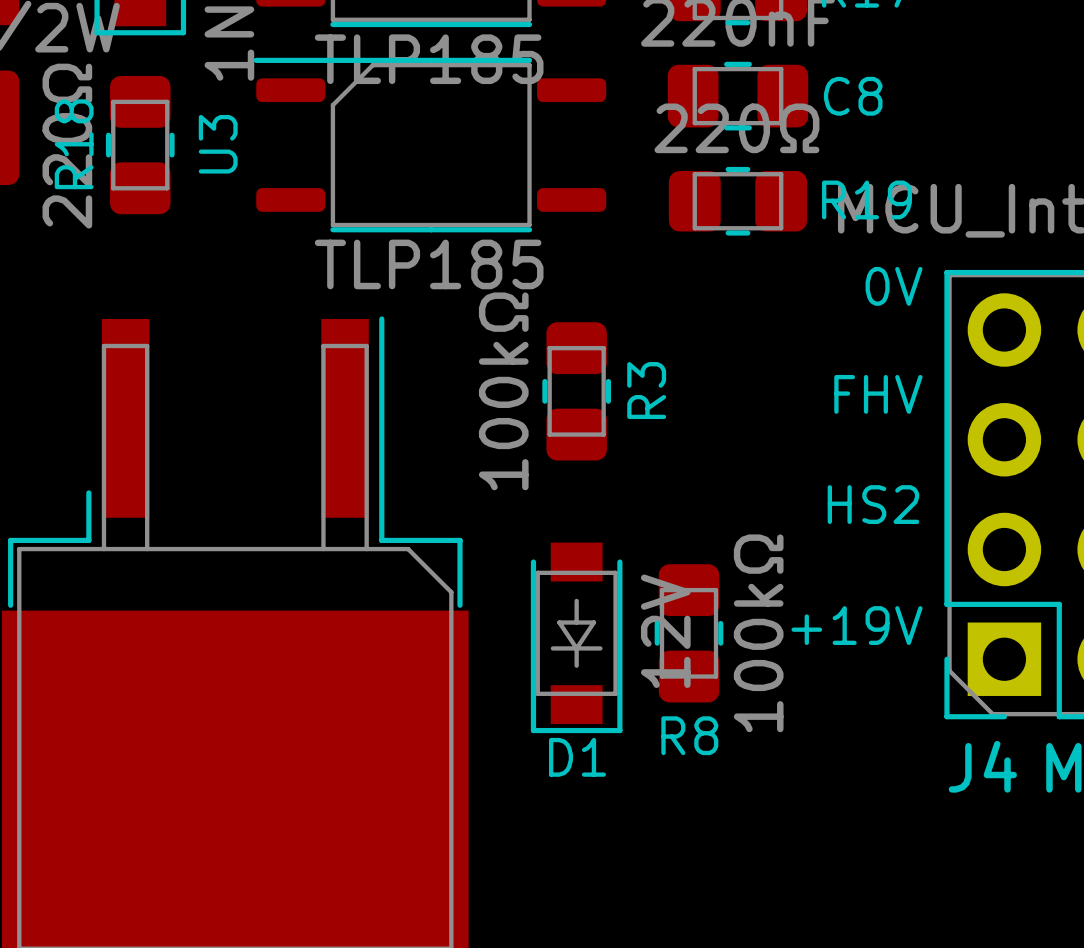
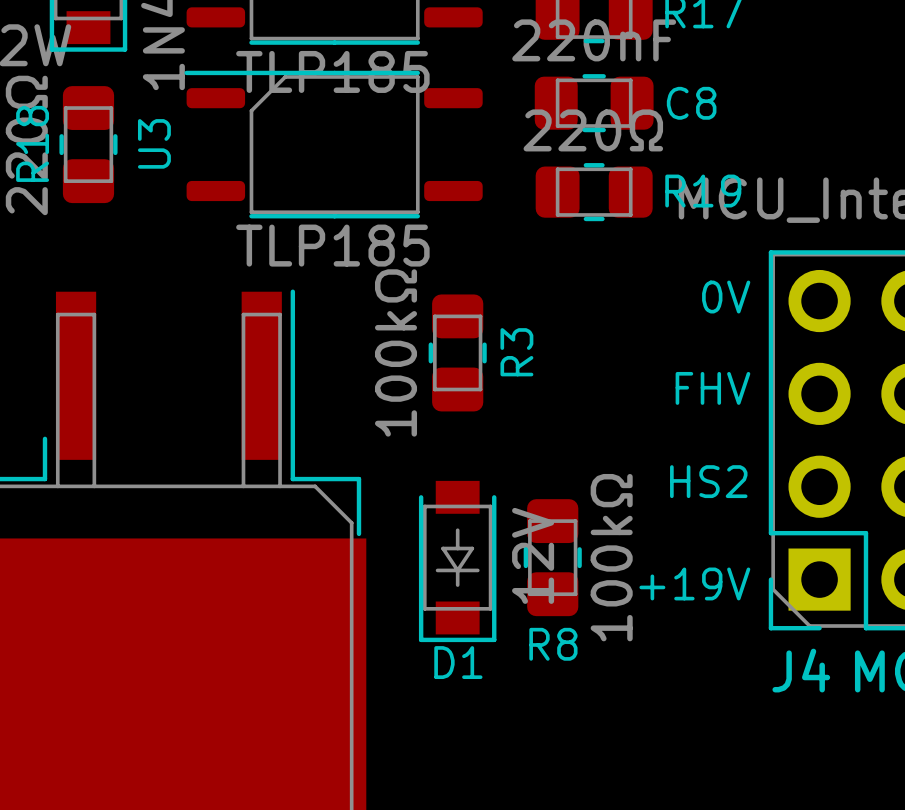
text position: 0V (894, 286) -> 0V (726, 297)
text position: FHV (878, 394) -> FHV (712, 388)
text position: HS2 (873, 504) -> HS2 (708, 481)
text position: +19V (857, 625) -> +19V (694, 583)

